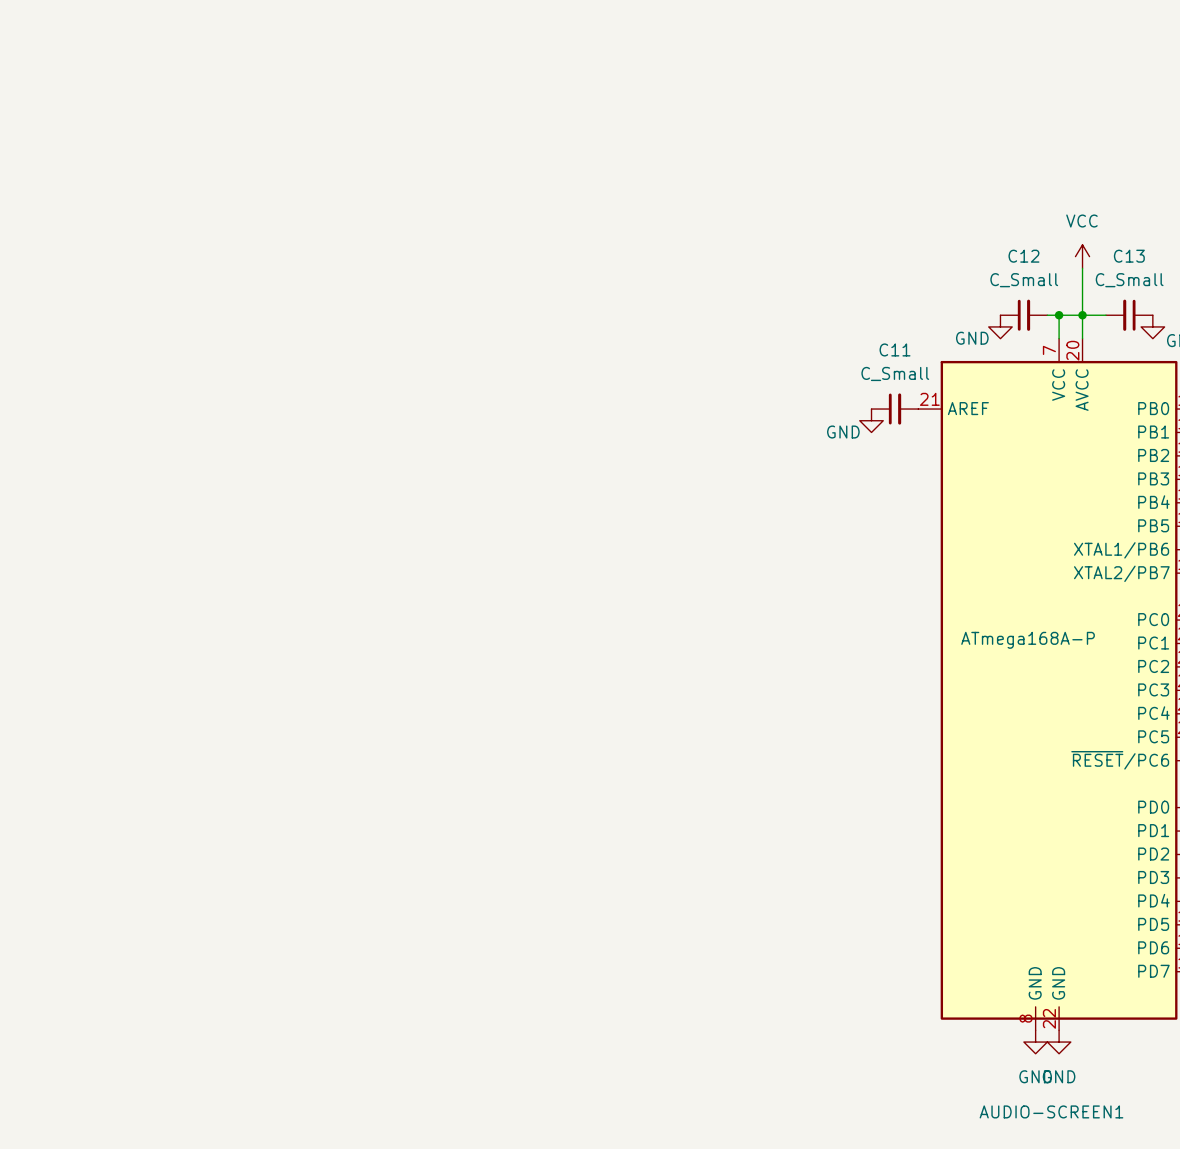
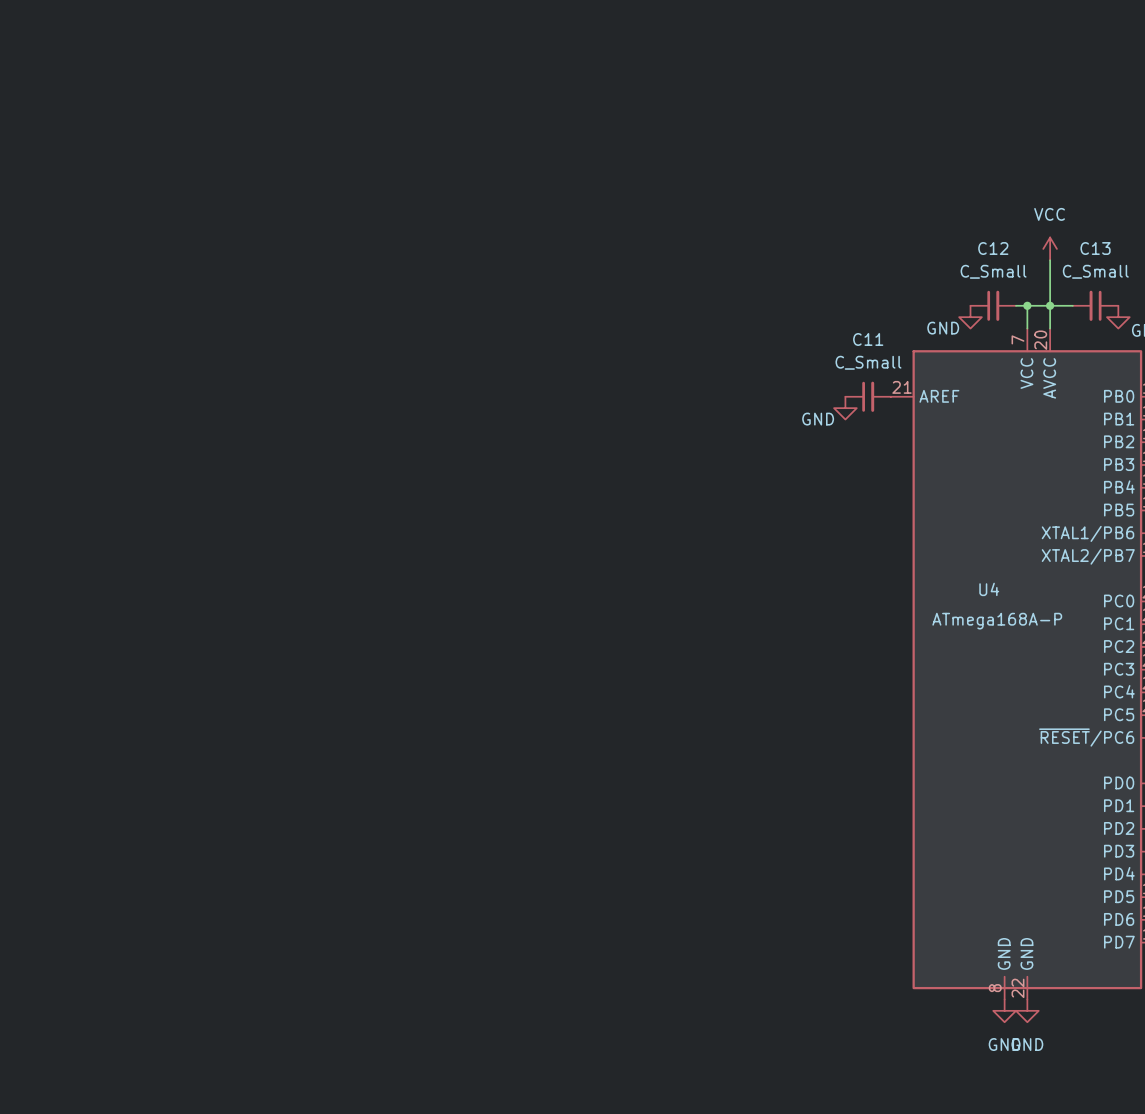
AUDIO-SCREEN1 name: AUDIO-SCREEN1 (1051, 1111) -> U4 (989, 589)

